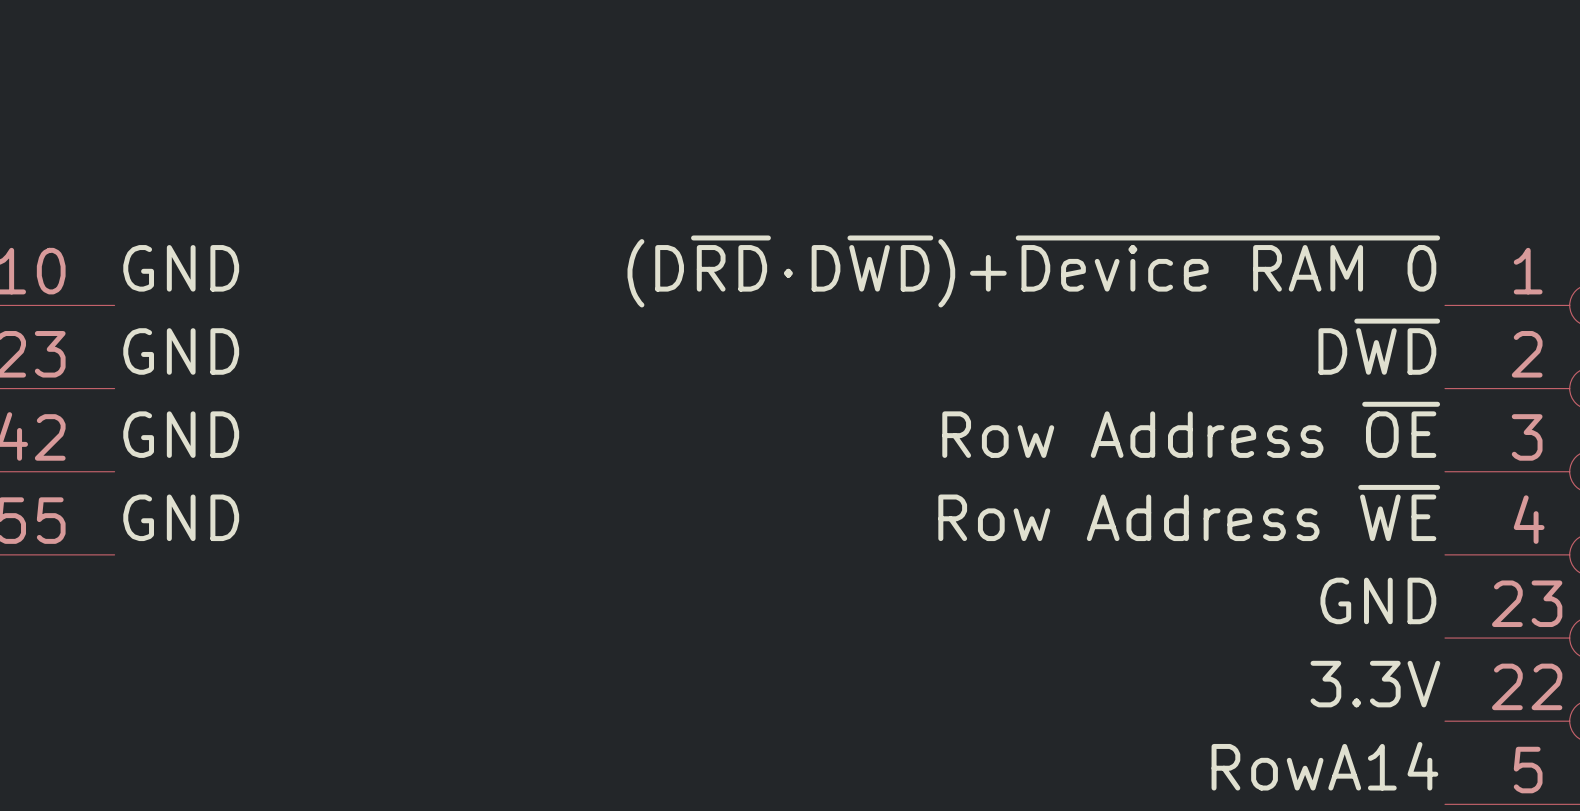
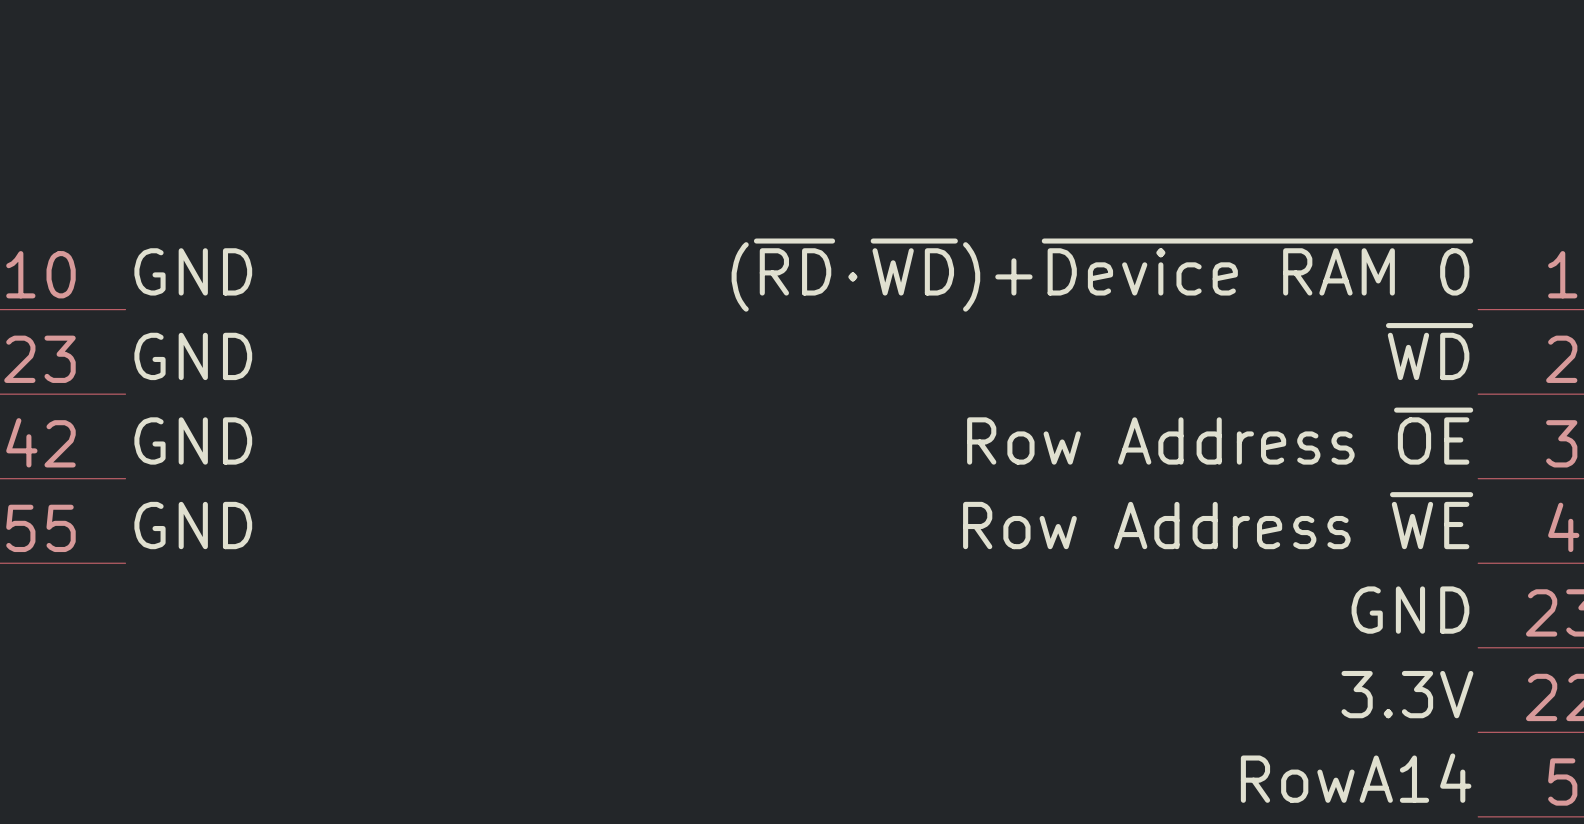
label: (D~{RD}·D~{WD})+~{Device RAM 0} (1033, 271) -> (~{RD}·~{WD})+~{Device RAM 0} (1102, 275)
label: D~{WD} (1379, 346) -> ~{WD} (1429, 351)

